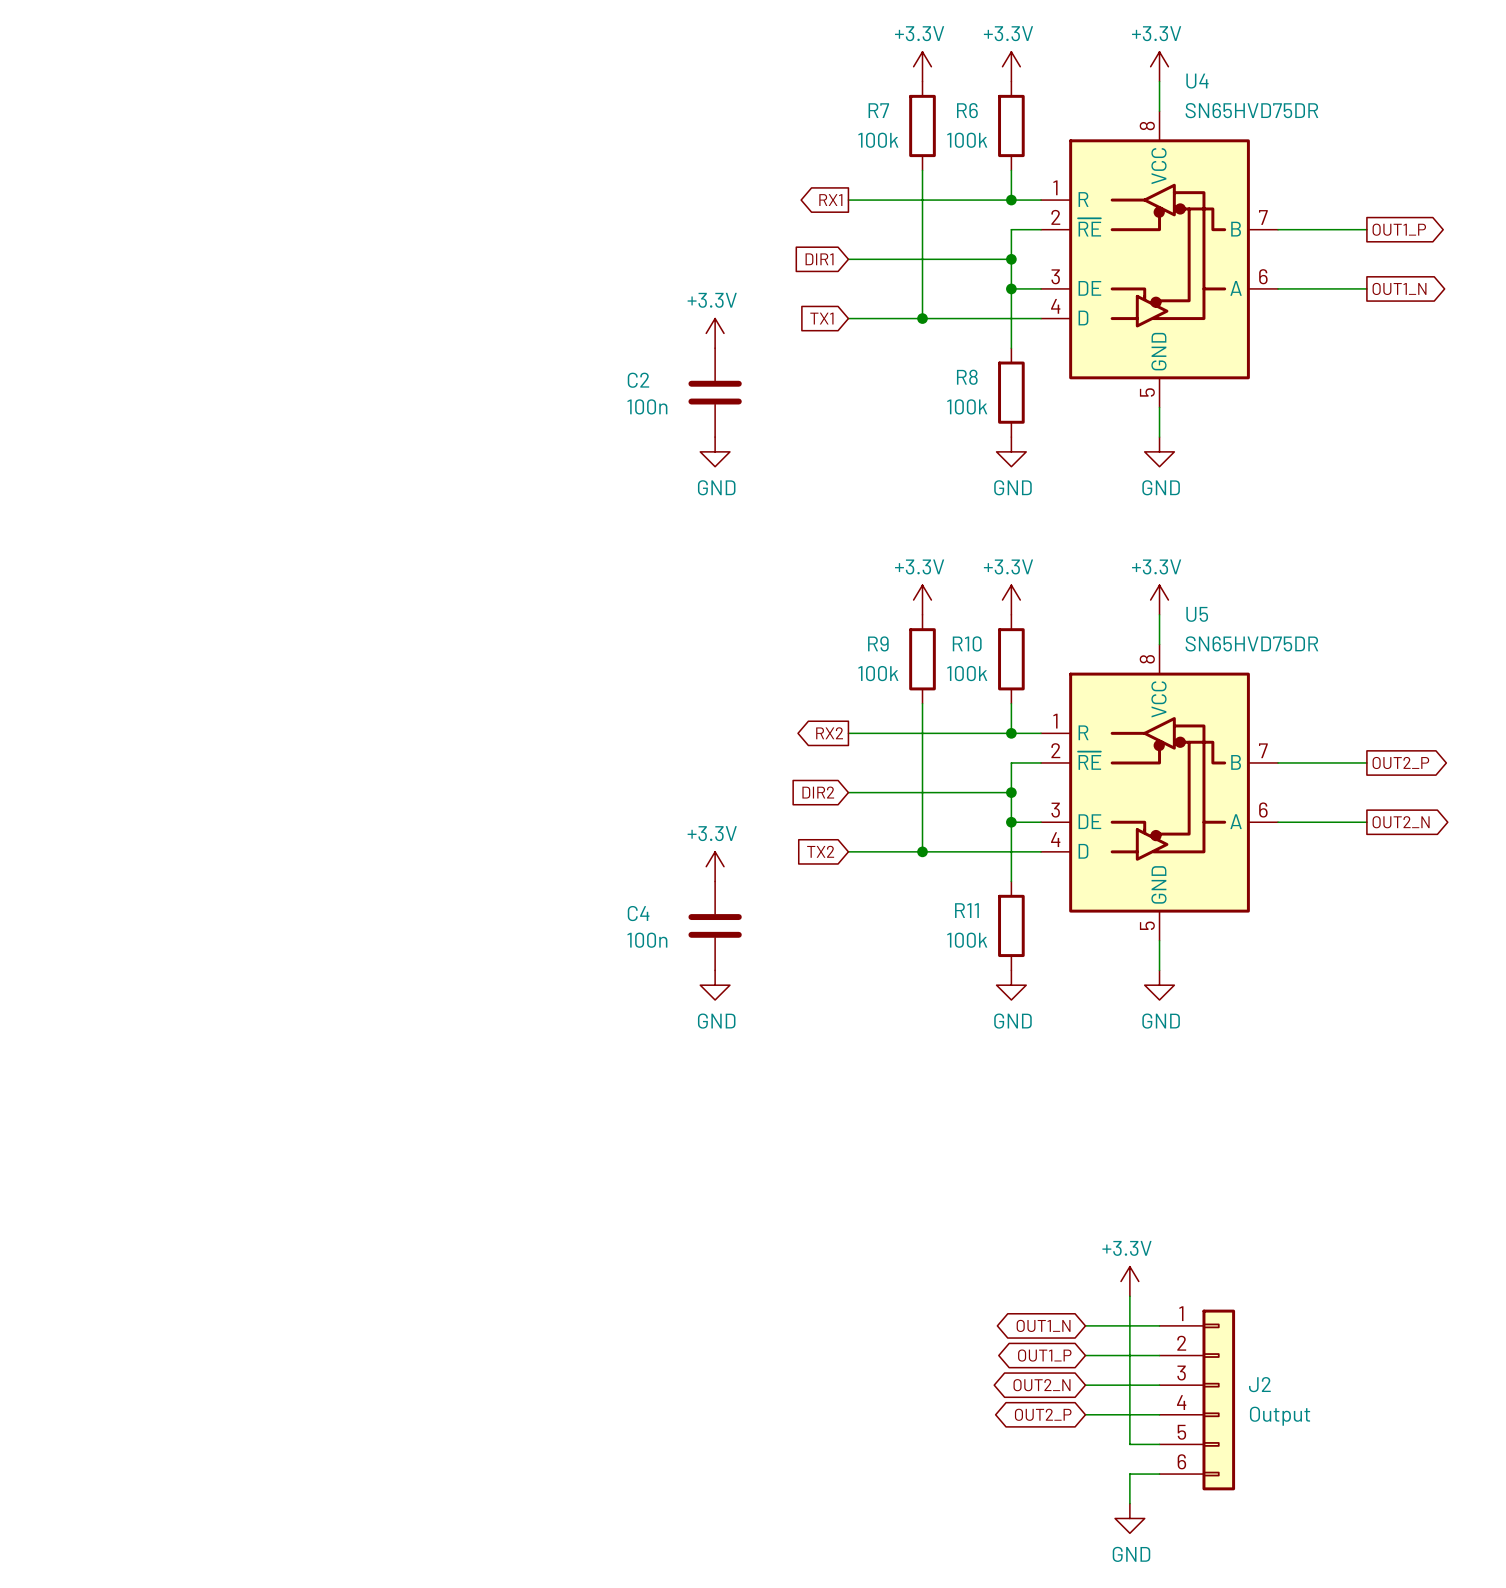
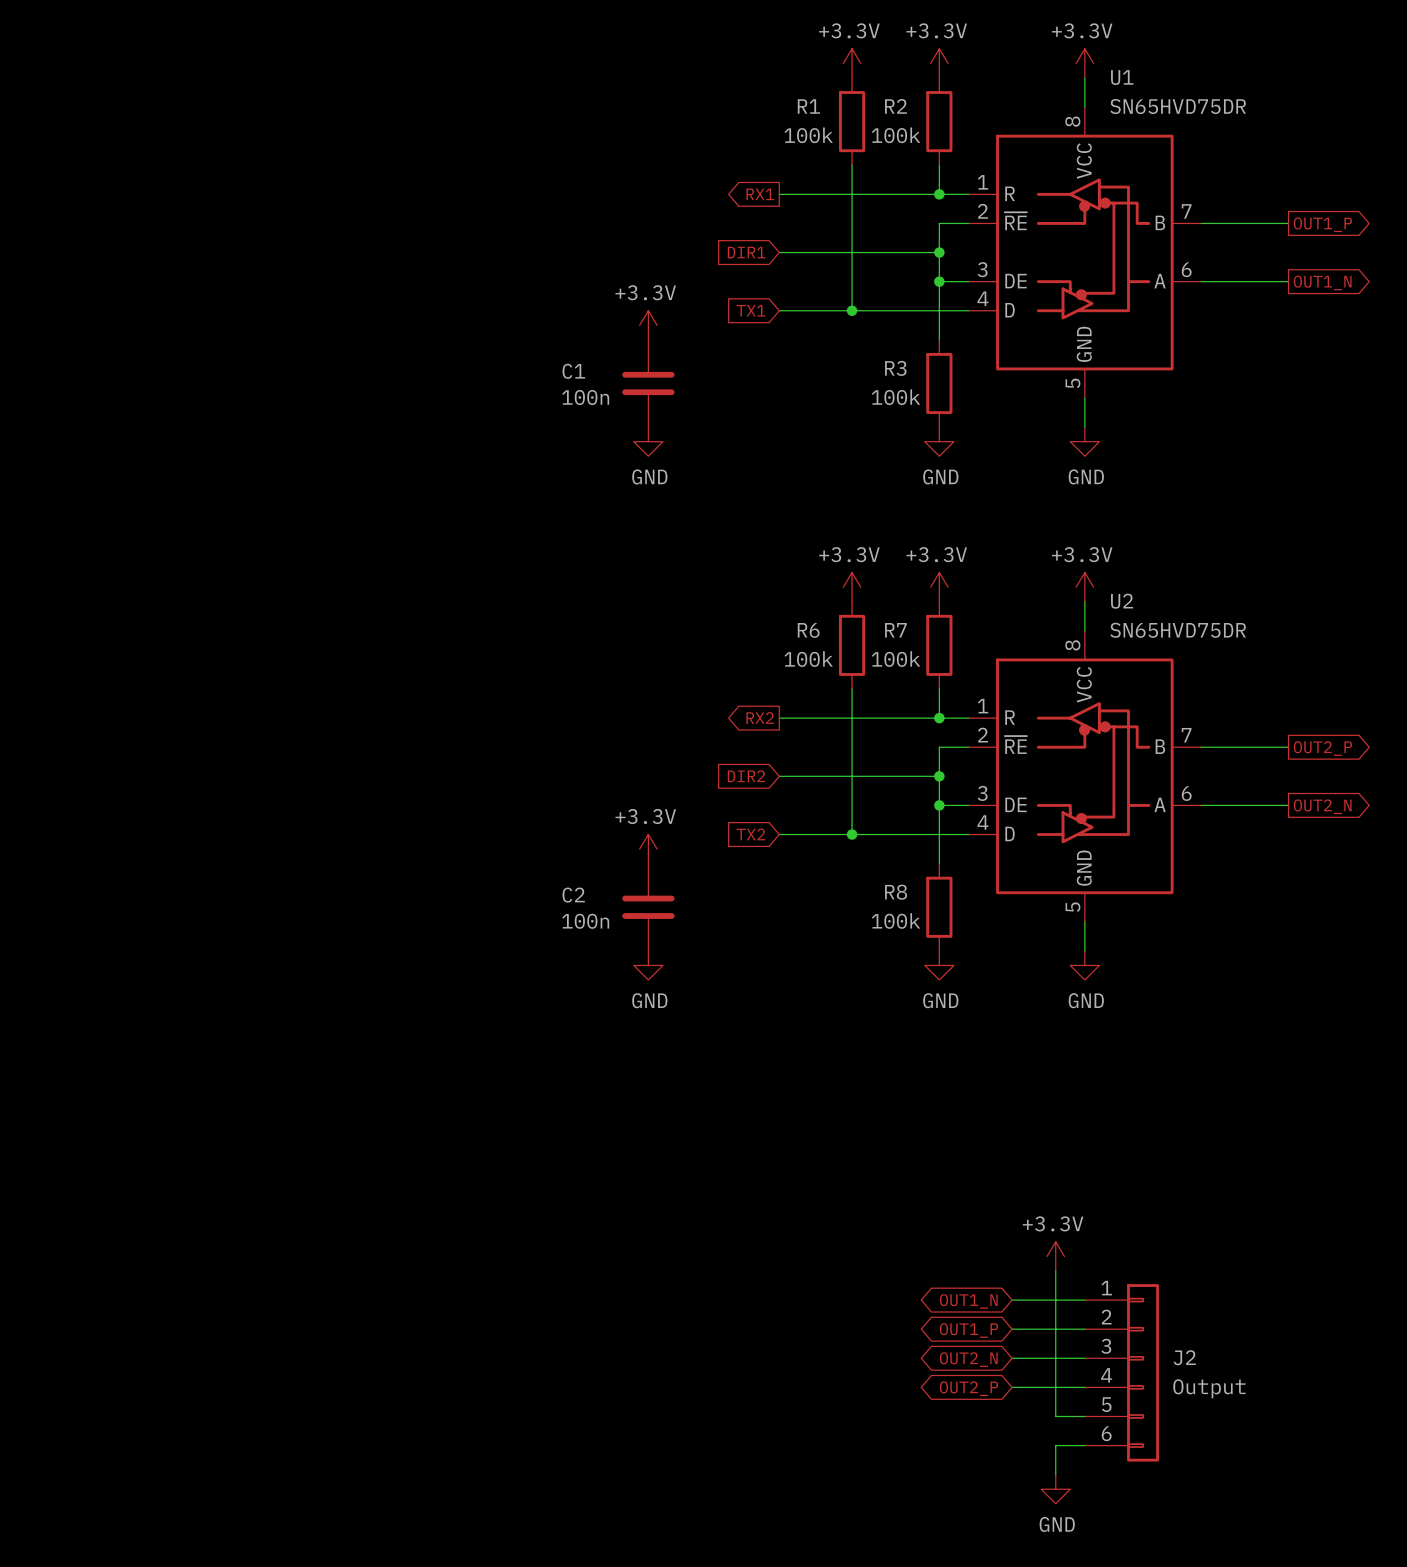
U4 name: U4 (1197, 81) -> U1 (1122, 77)
R7 name: R7 (878, 110) -> R1 (808, 106)
R6 name: R6 (967, 110) -> R2 (895, 106)
R8 name: R8 (967, 377) -> R3 (895, 368)
C2 name: C2 (638, 380) -> C1 (573, 371)
U5 name: U5 (1197, 614) -> U2 (1122, 601)
R9 name: R9 (878, 643) -> R6 (808, 630)
R10 name: R10 (967, 643) -> R7 (895, 630)
R11 name: R11 (966, 910) -> R8 (896, 892)
C4 name: C4 (638, 913) -> C2 (573, 895)

